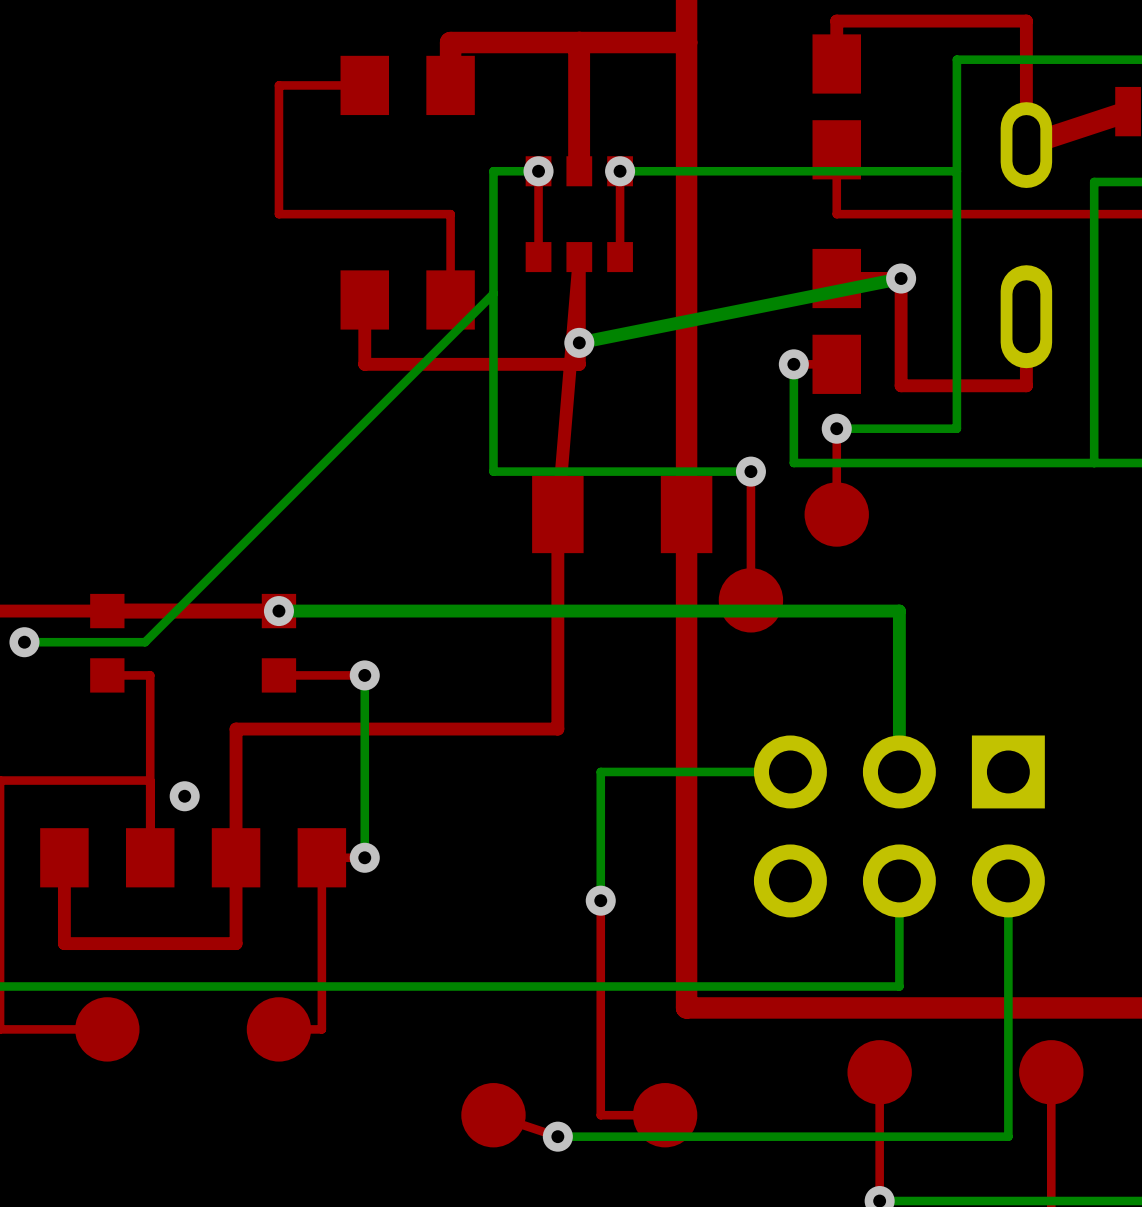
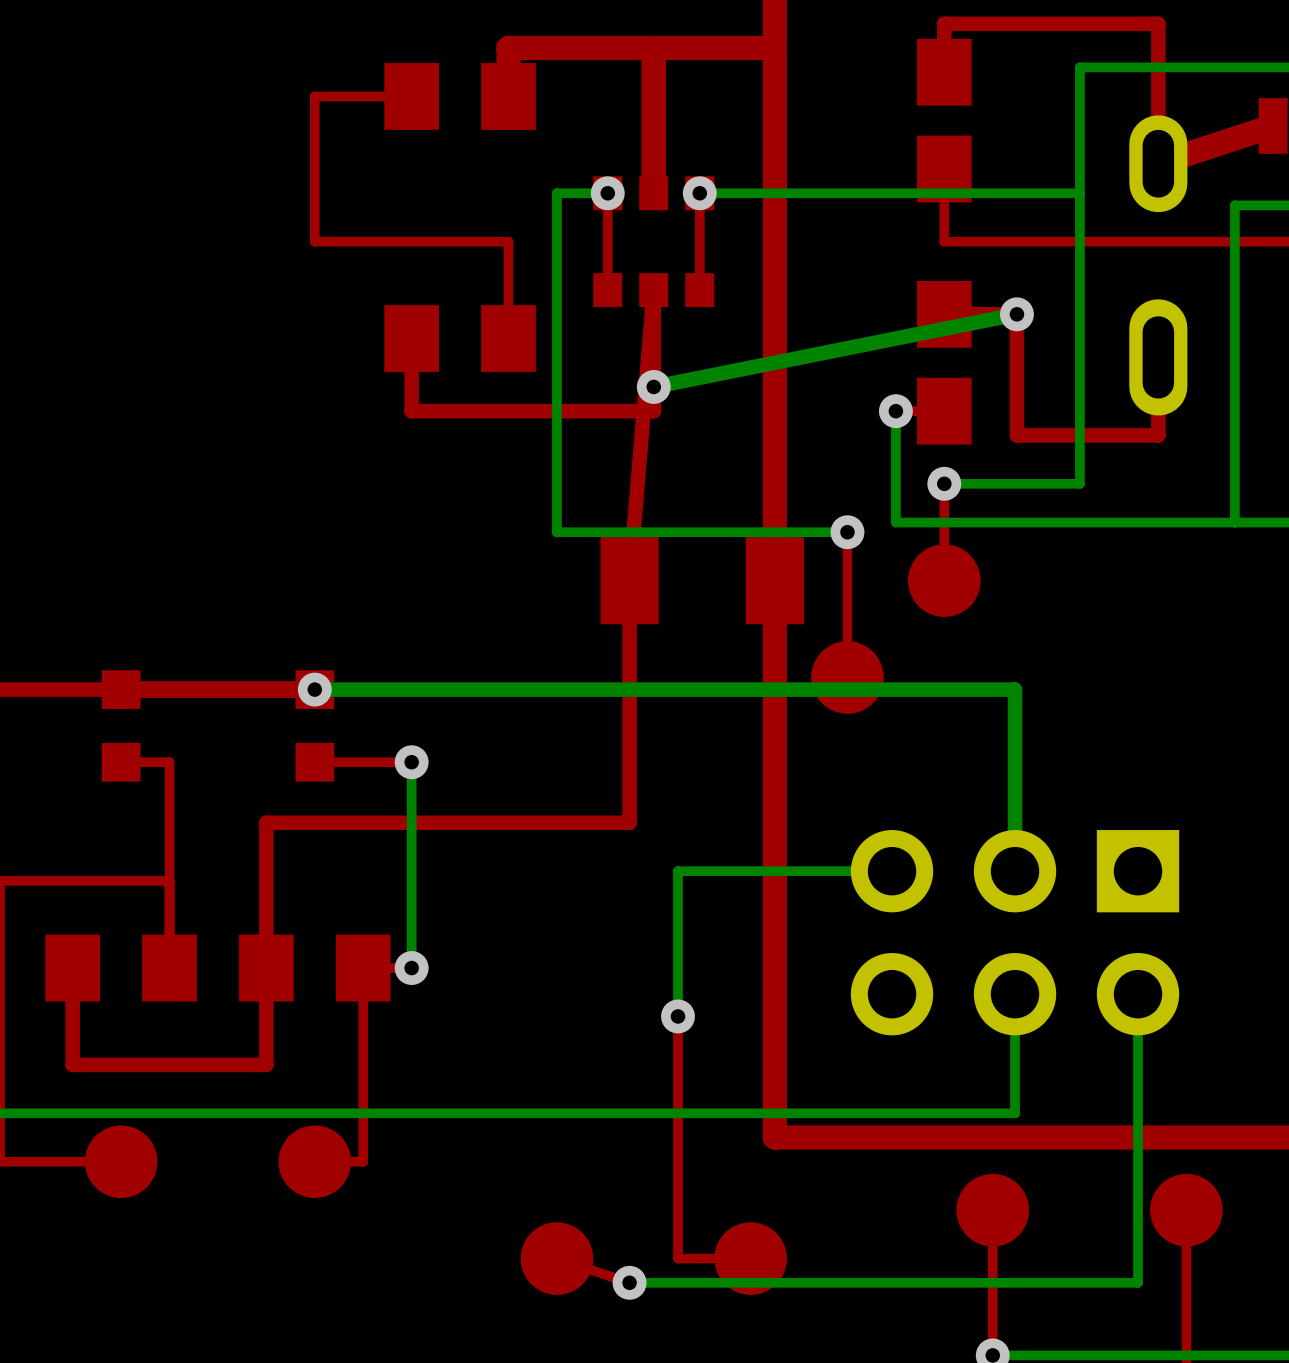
bottom track: (493, 293) (145, 642) (24, 642) -> none
via: (24, 642) -> none
via: (184, 796) -> none

